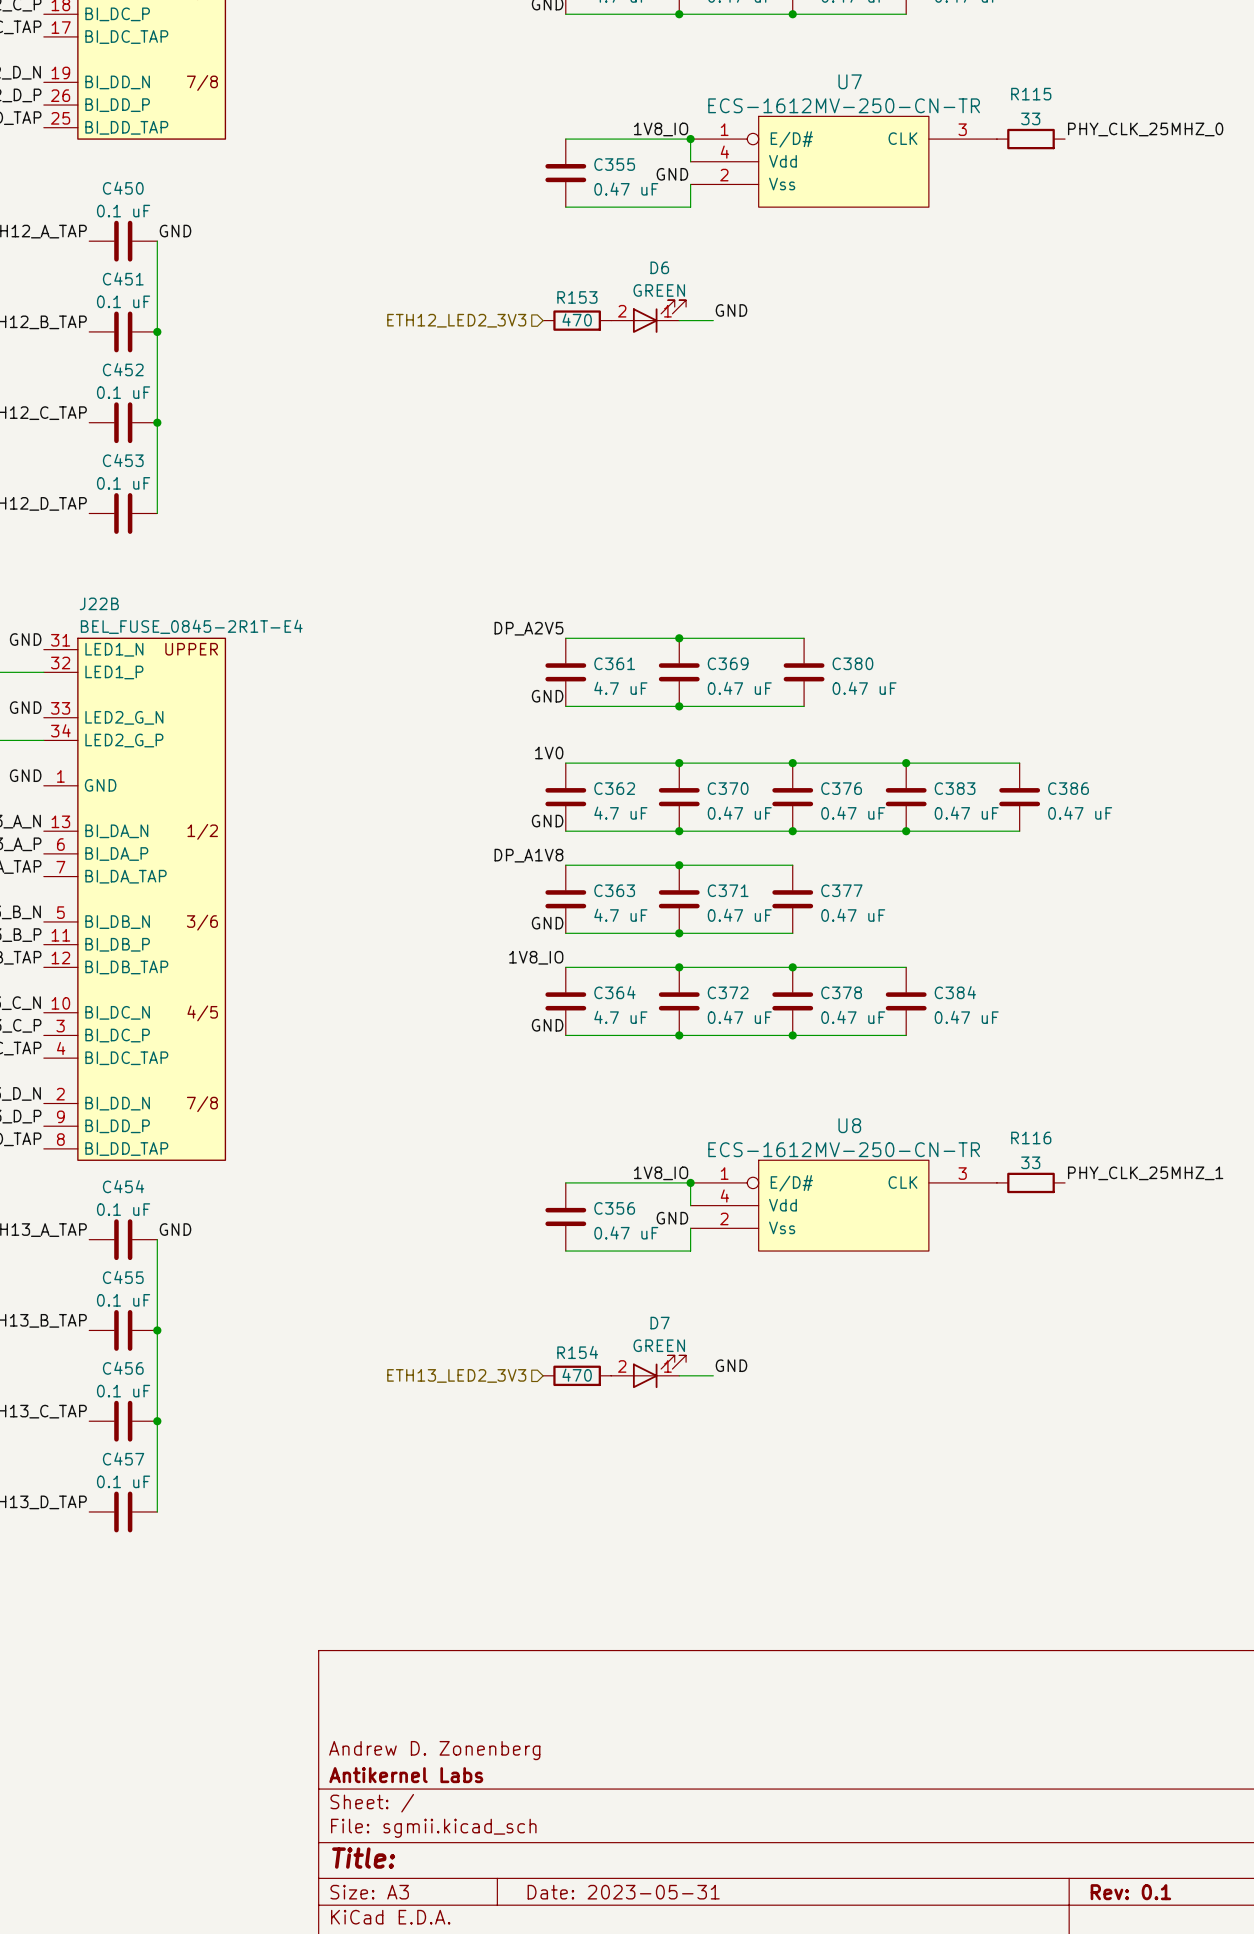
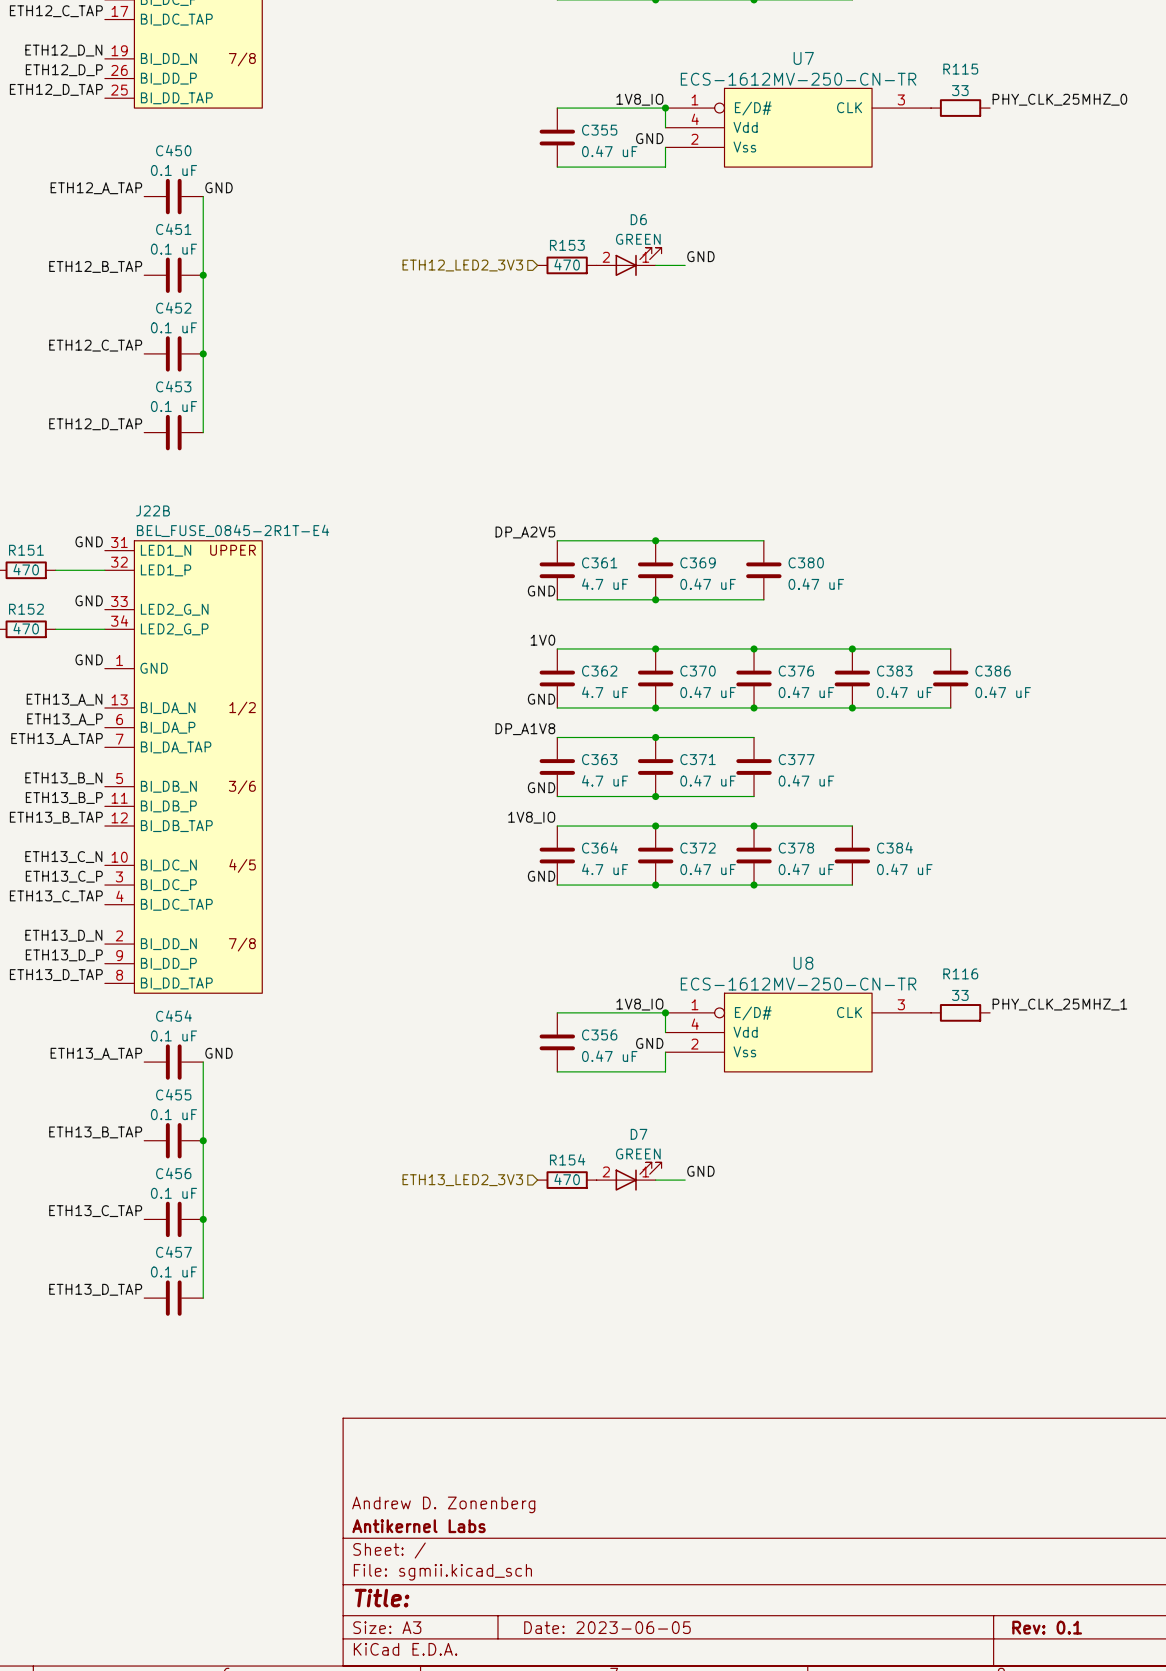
title block: Date: 2023-05-31 (623, 1892) -> Date: 2023-06-05 (607, 1627)

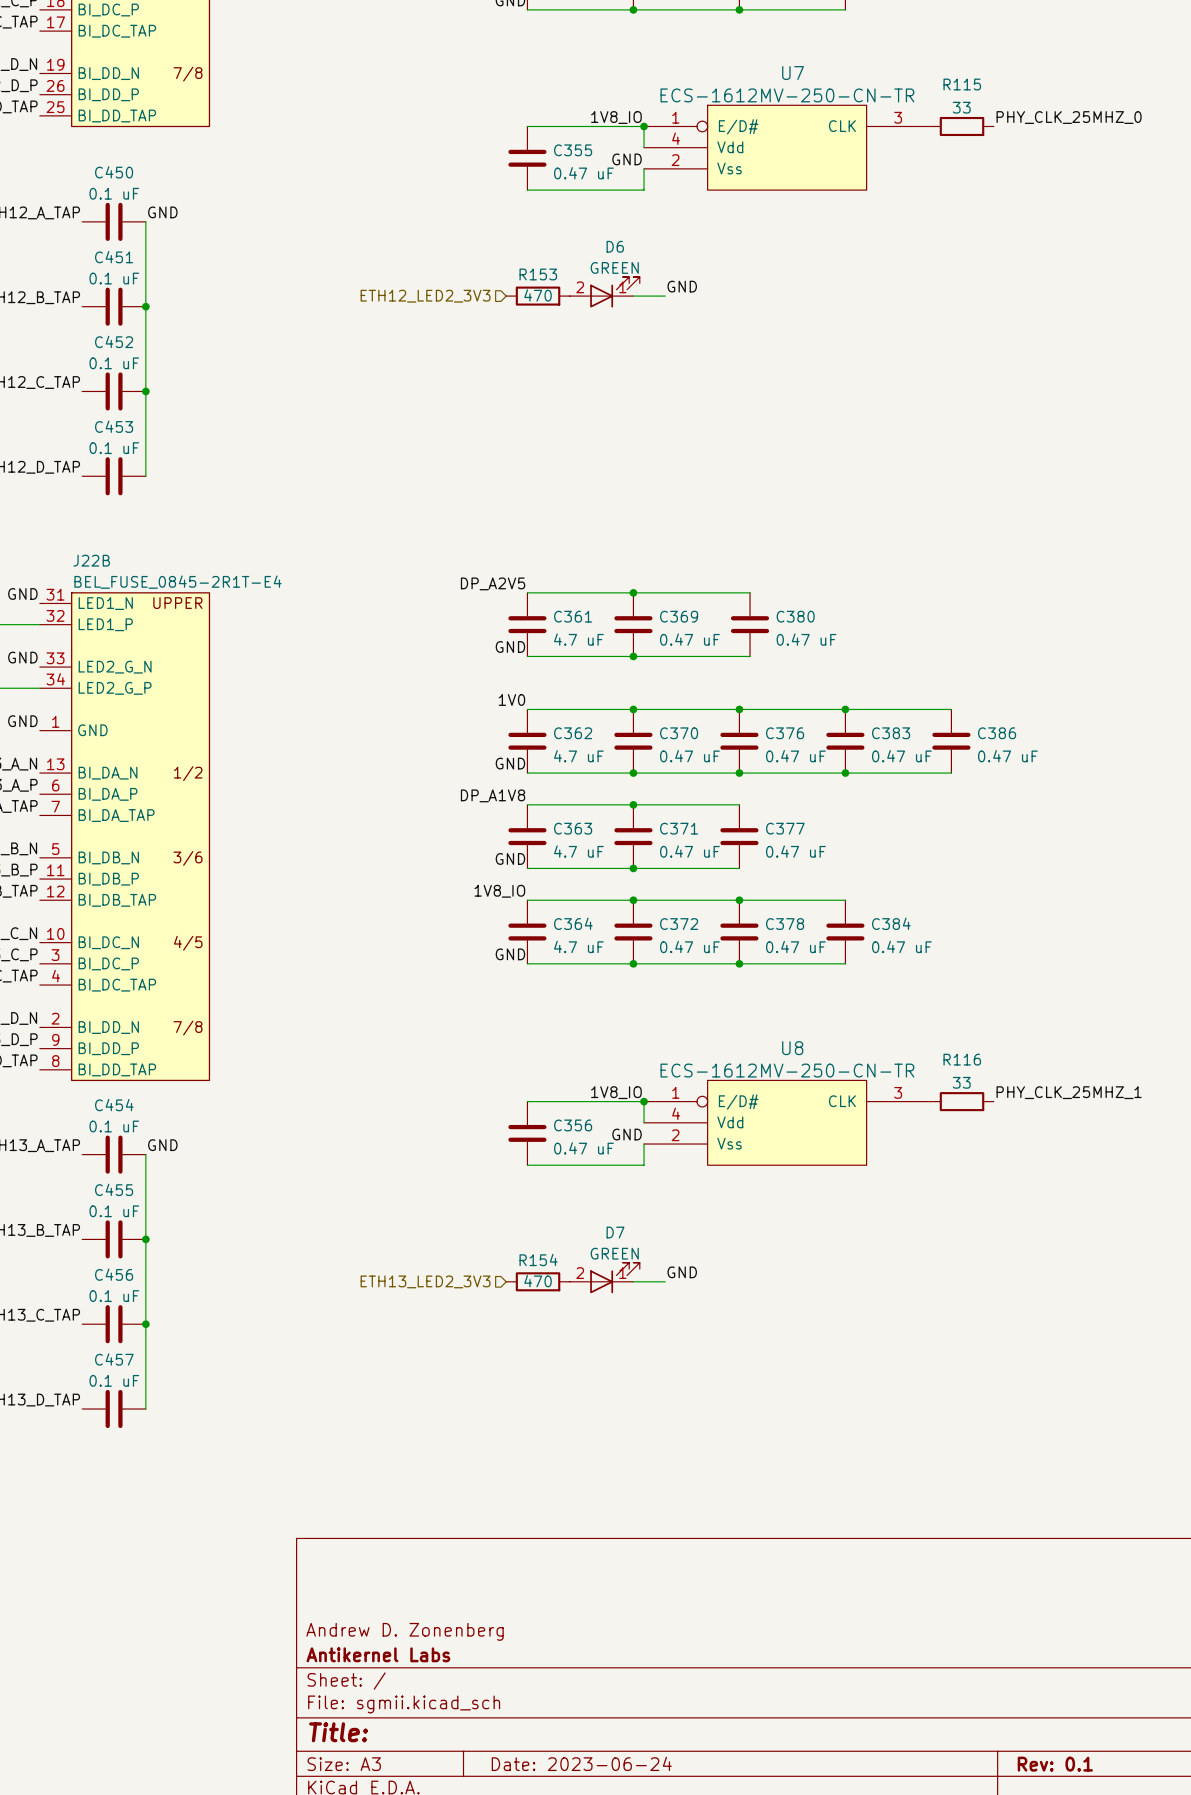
title block: Date: 2023-06-05 (607, 1627) -> Date: 2023-06-24 (581, 1763)

